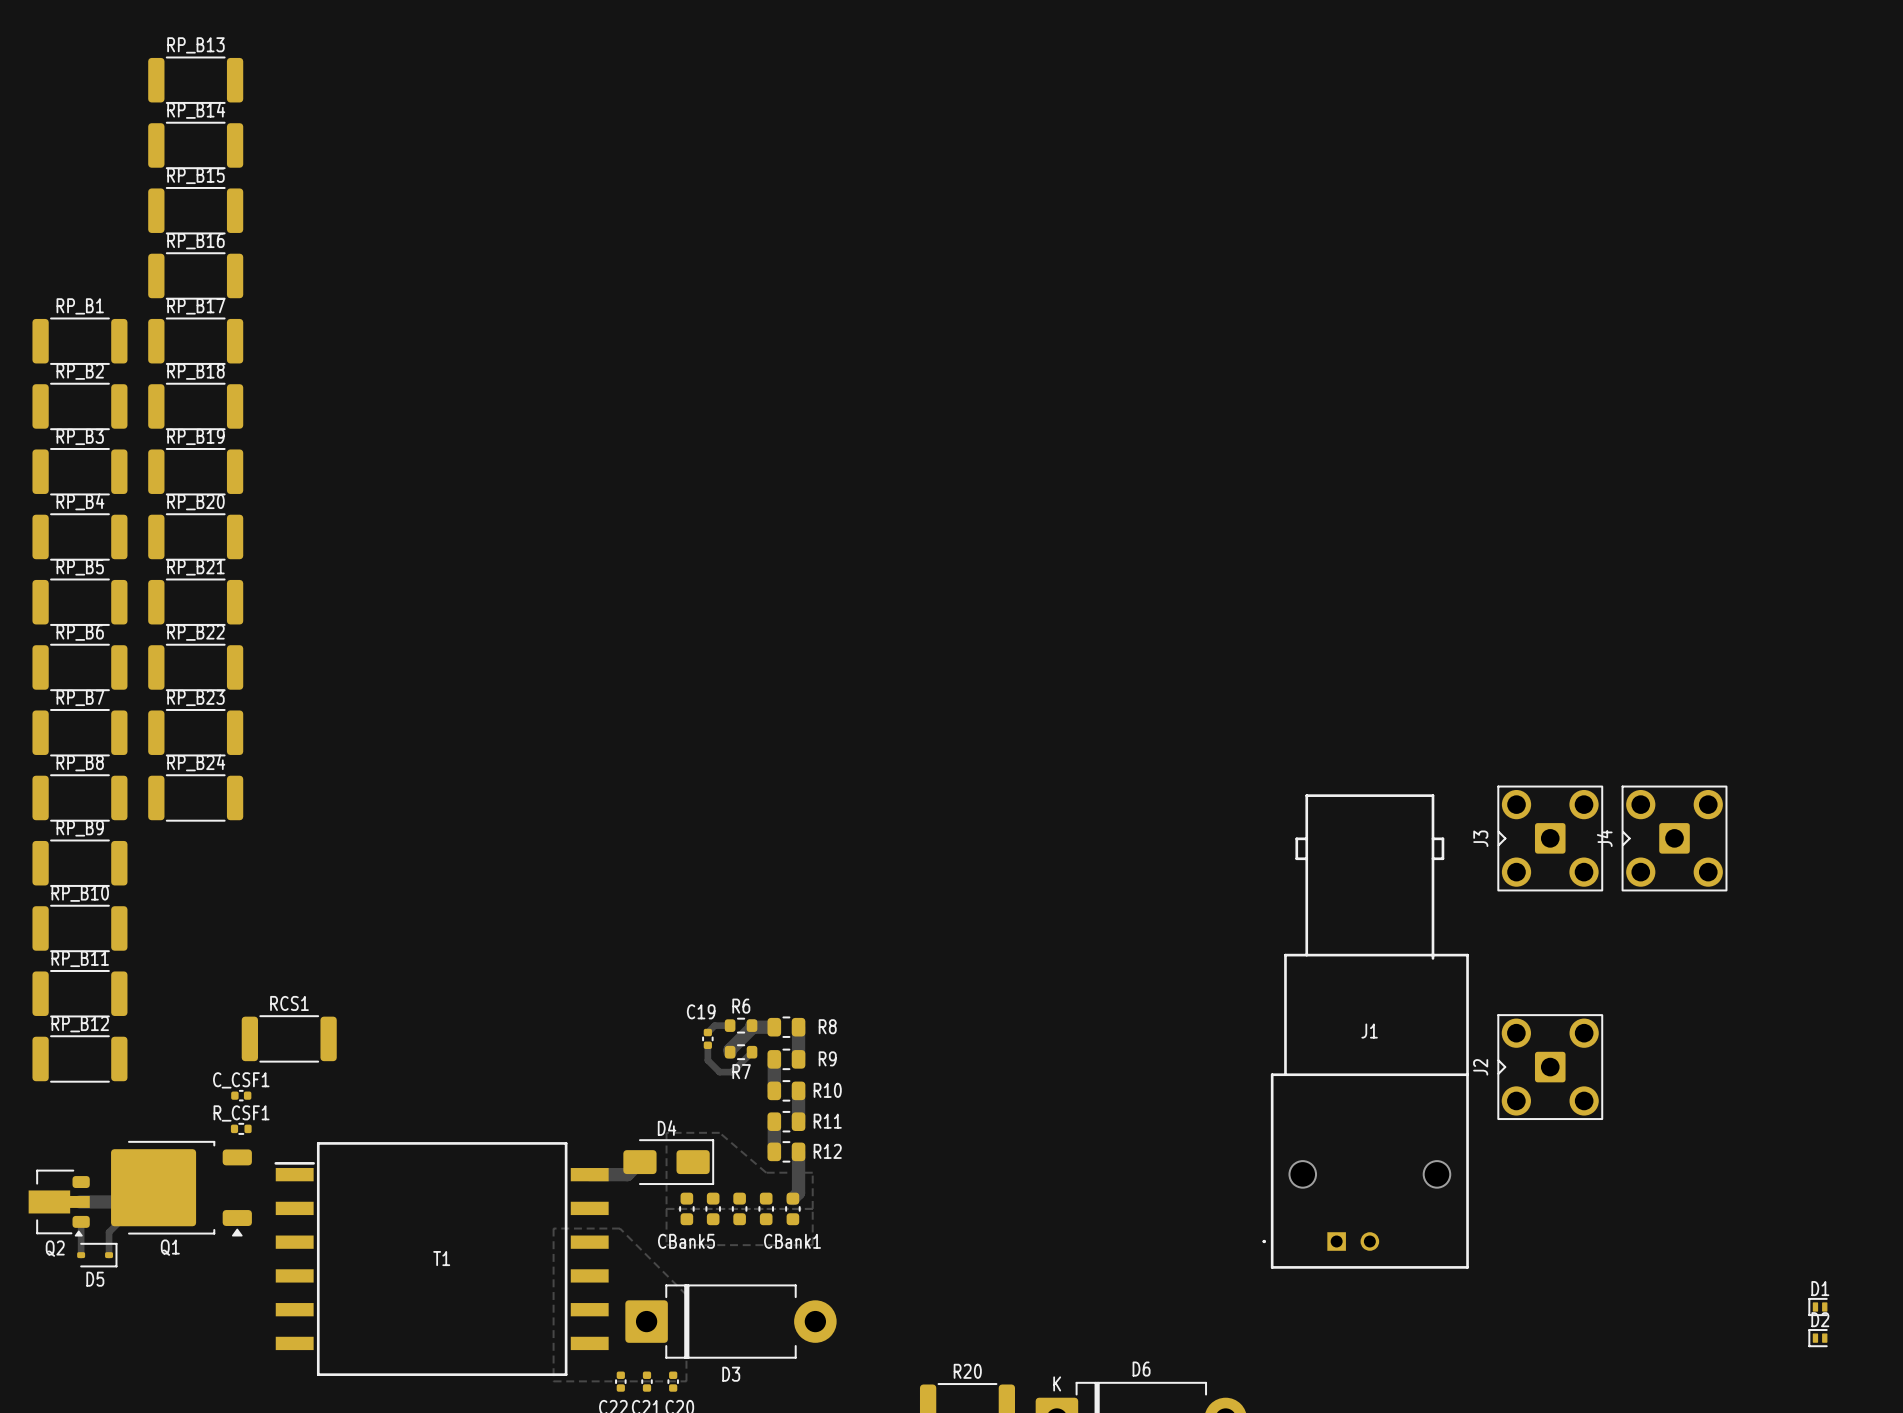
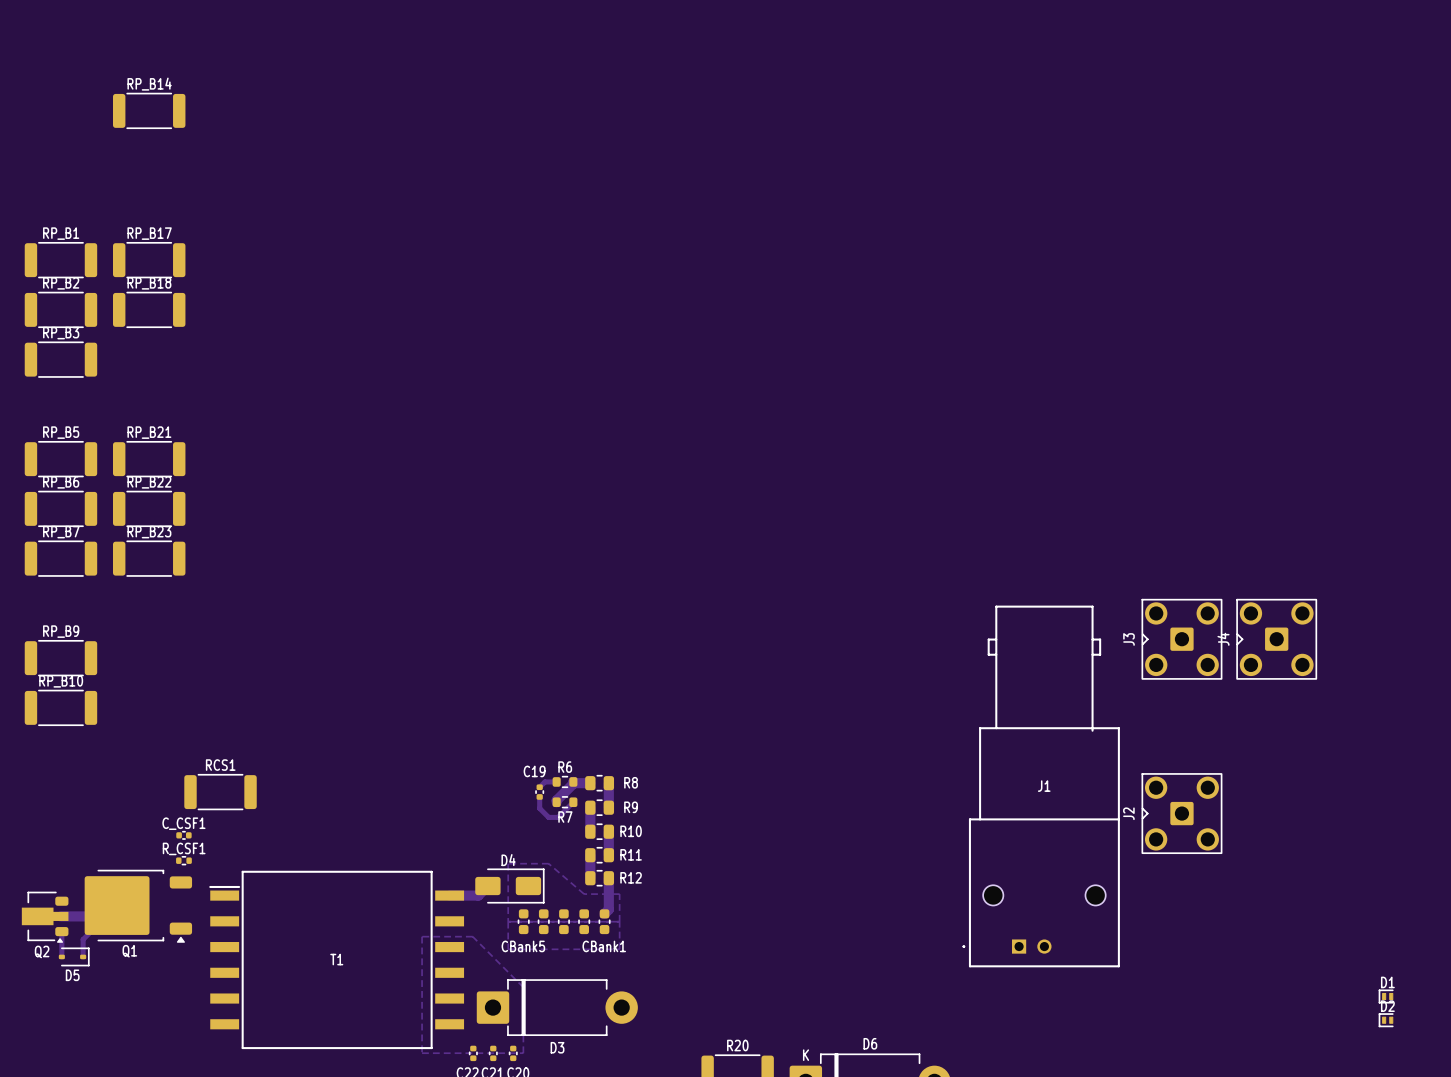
RP_B13: (195, 80) -> none
RP_B15: (195, 210) -> none
RP_B16: (195, 275) -> none
RP_B19: (195, 471) -> none
RP_B4: (79, 536) -> none
RP_B20: (195, 536) -> none
RP_B8: (79, 797) -> none
RP_B24: (195, 797) -> none
RP_B11: (79, 993) -> none
RP_B12: (79, 1058) -> none

